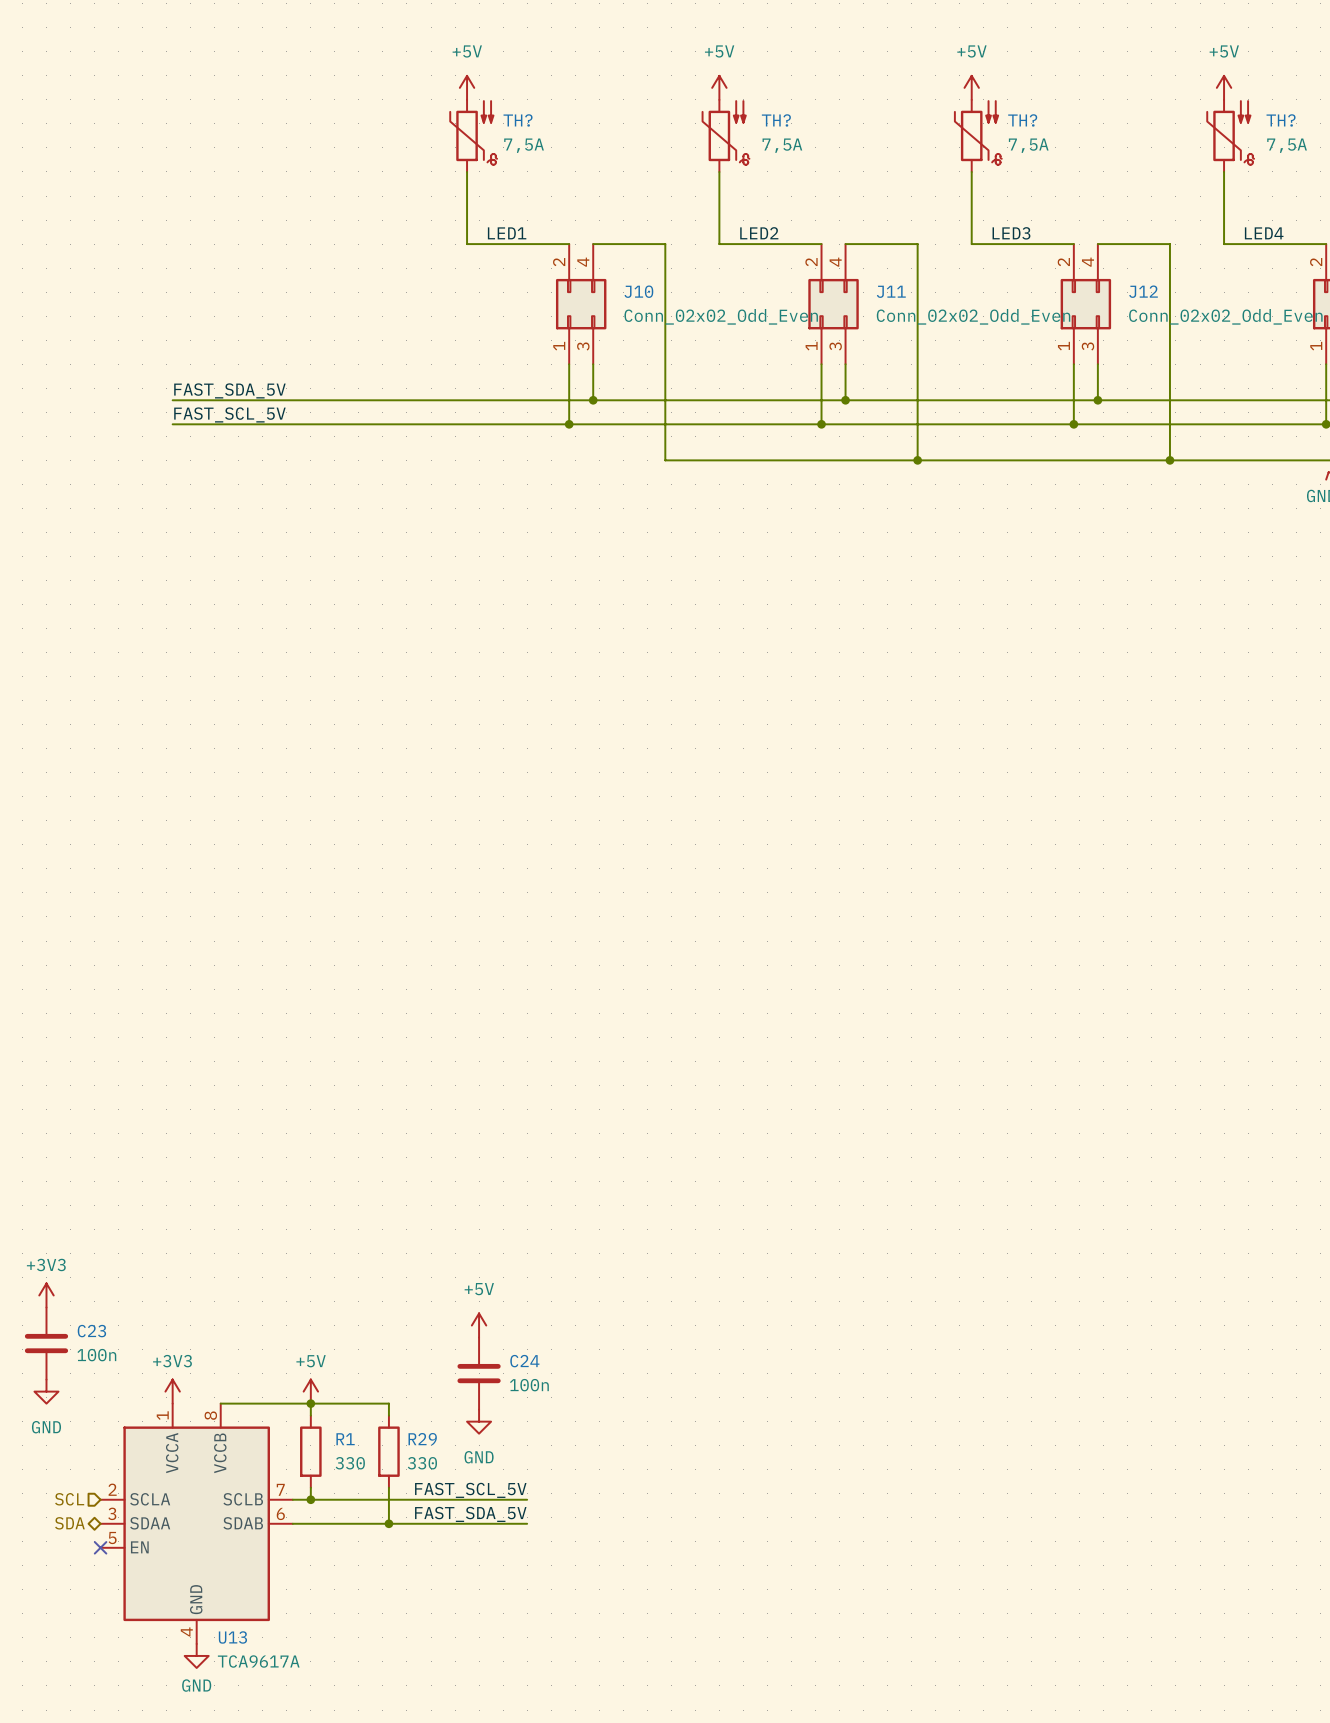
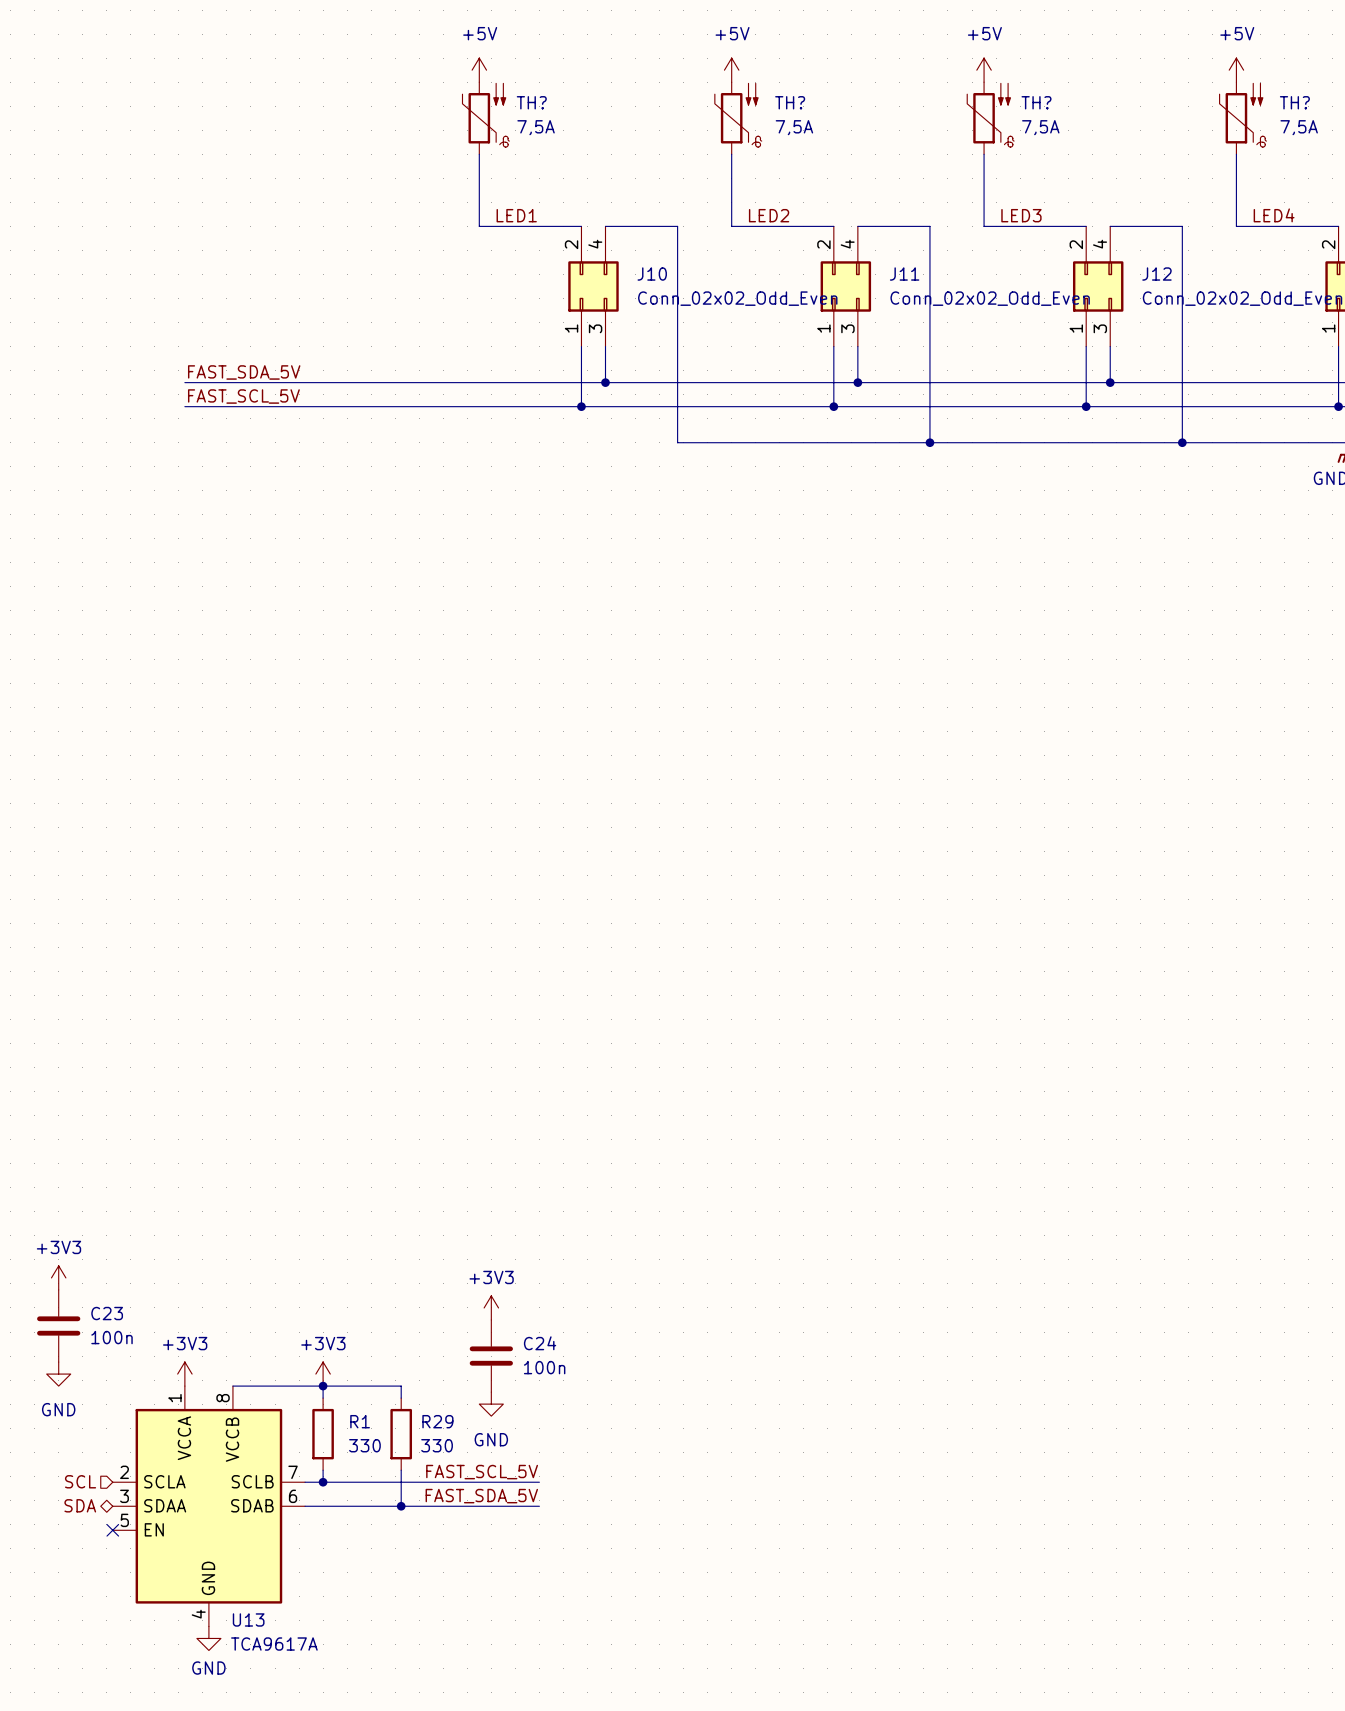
power symbol: +5V (479, 1325) -> +3V3 (491, 1307)
power symbol: +5V (310, 1391) -> +3V3 (323, 1374)

